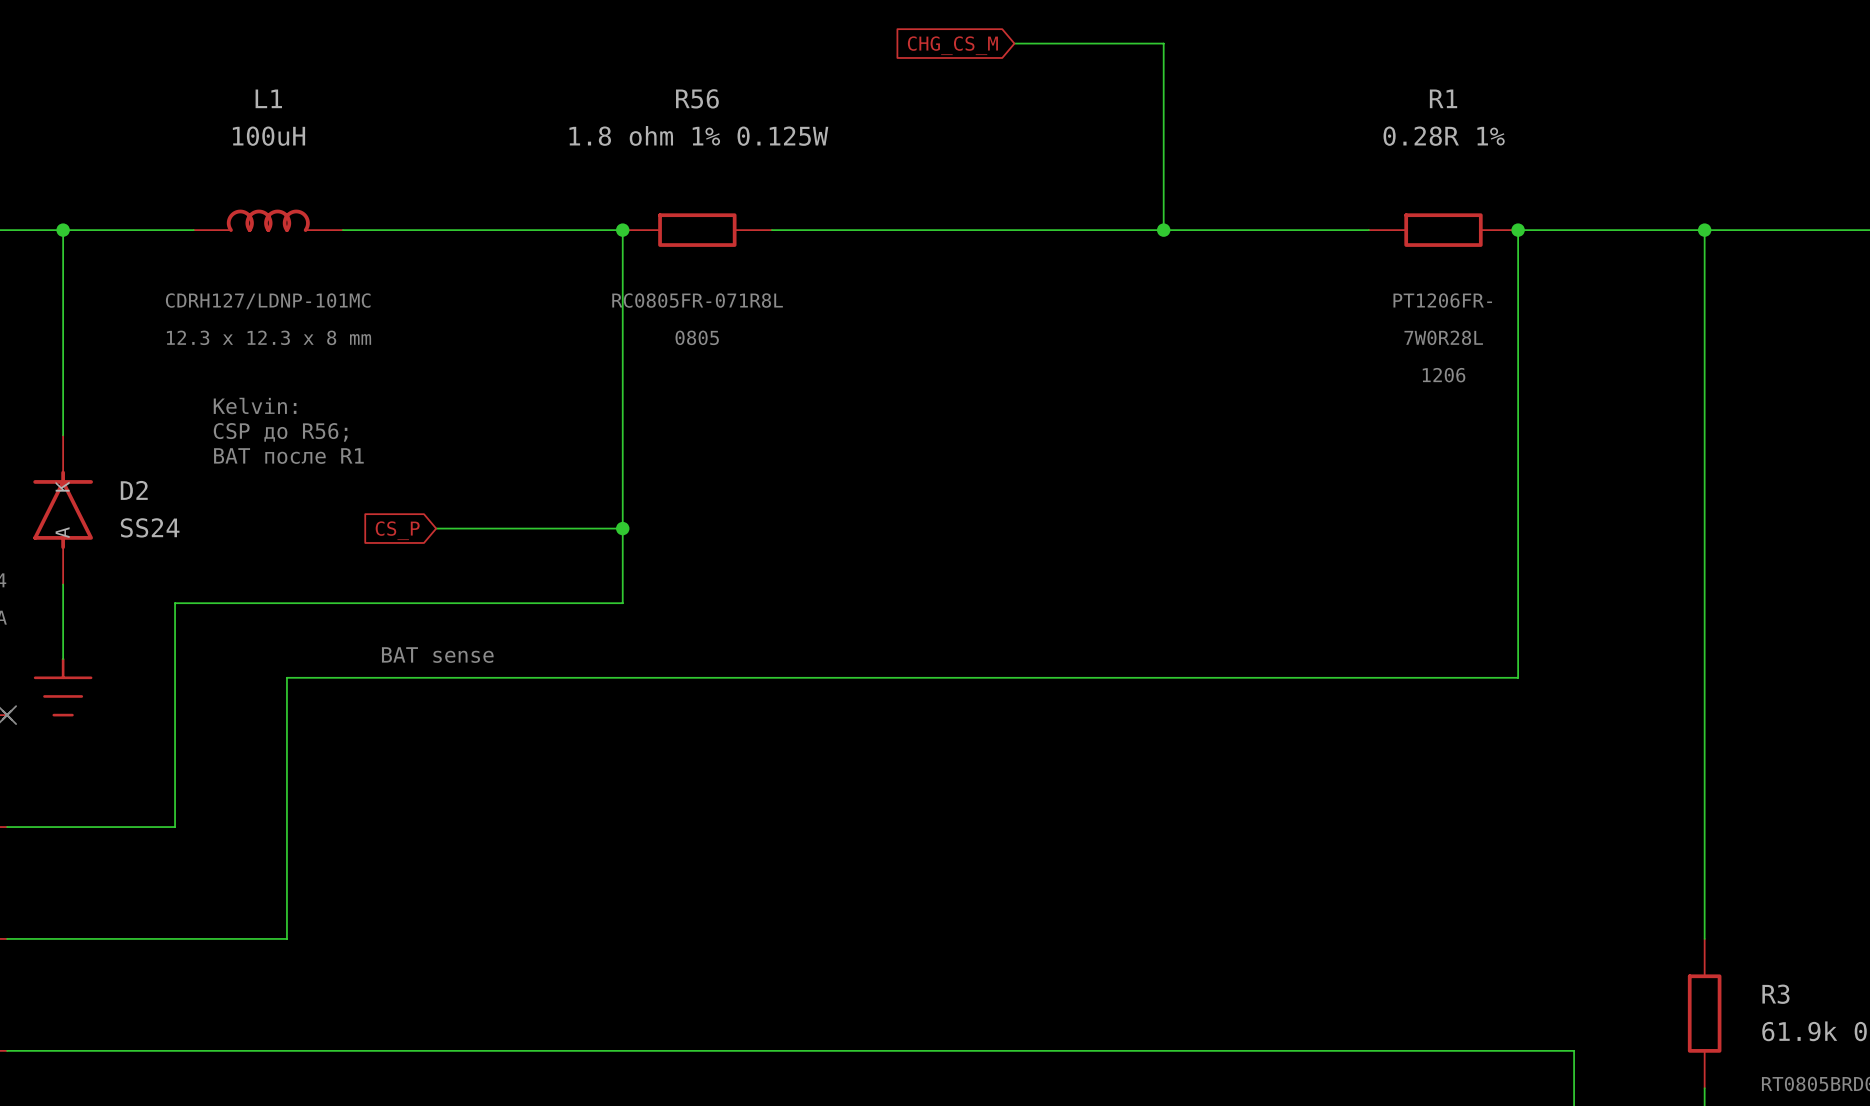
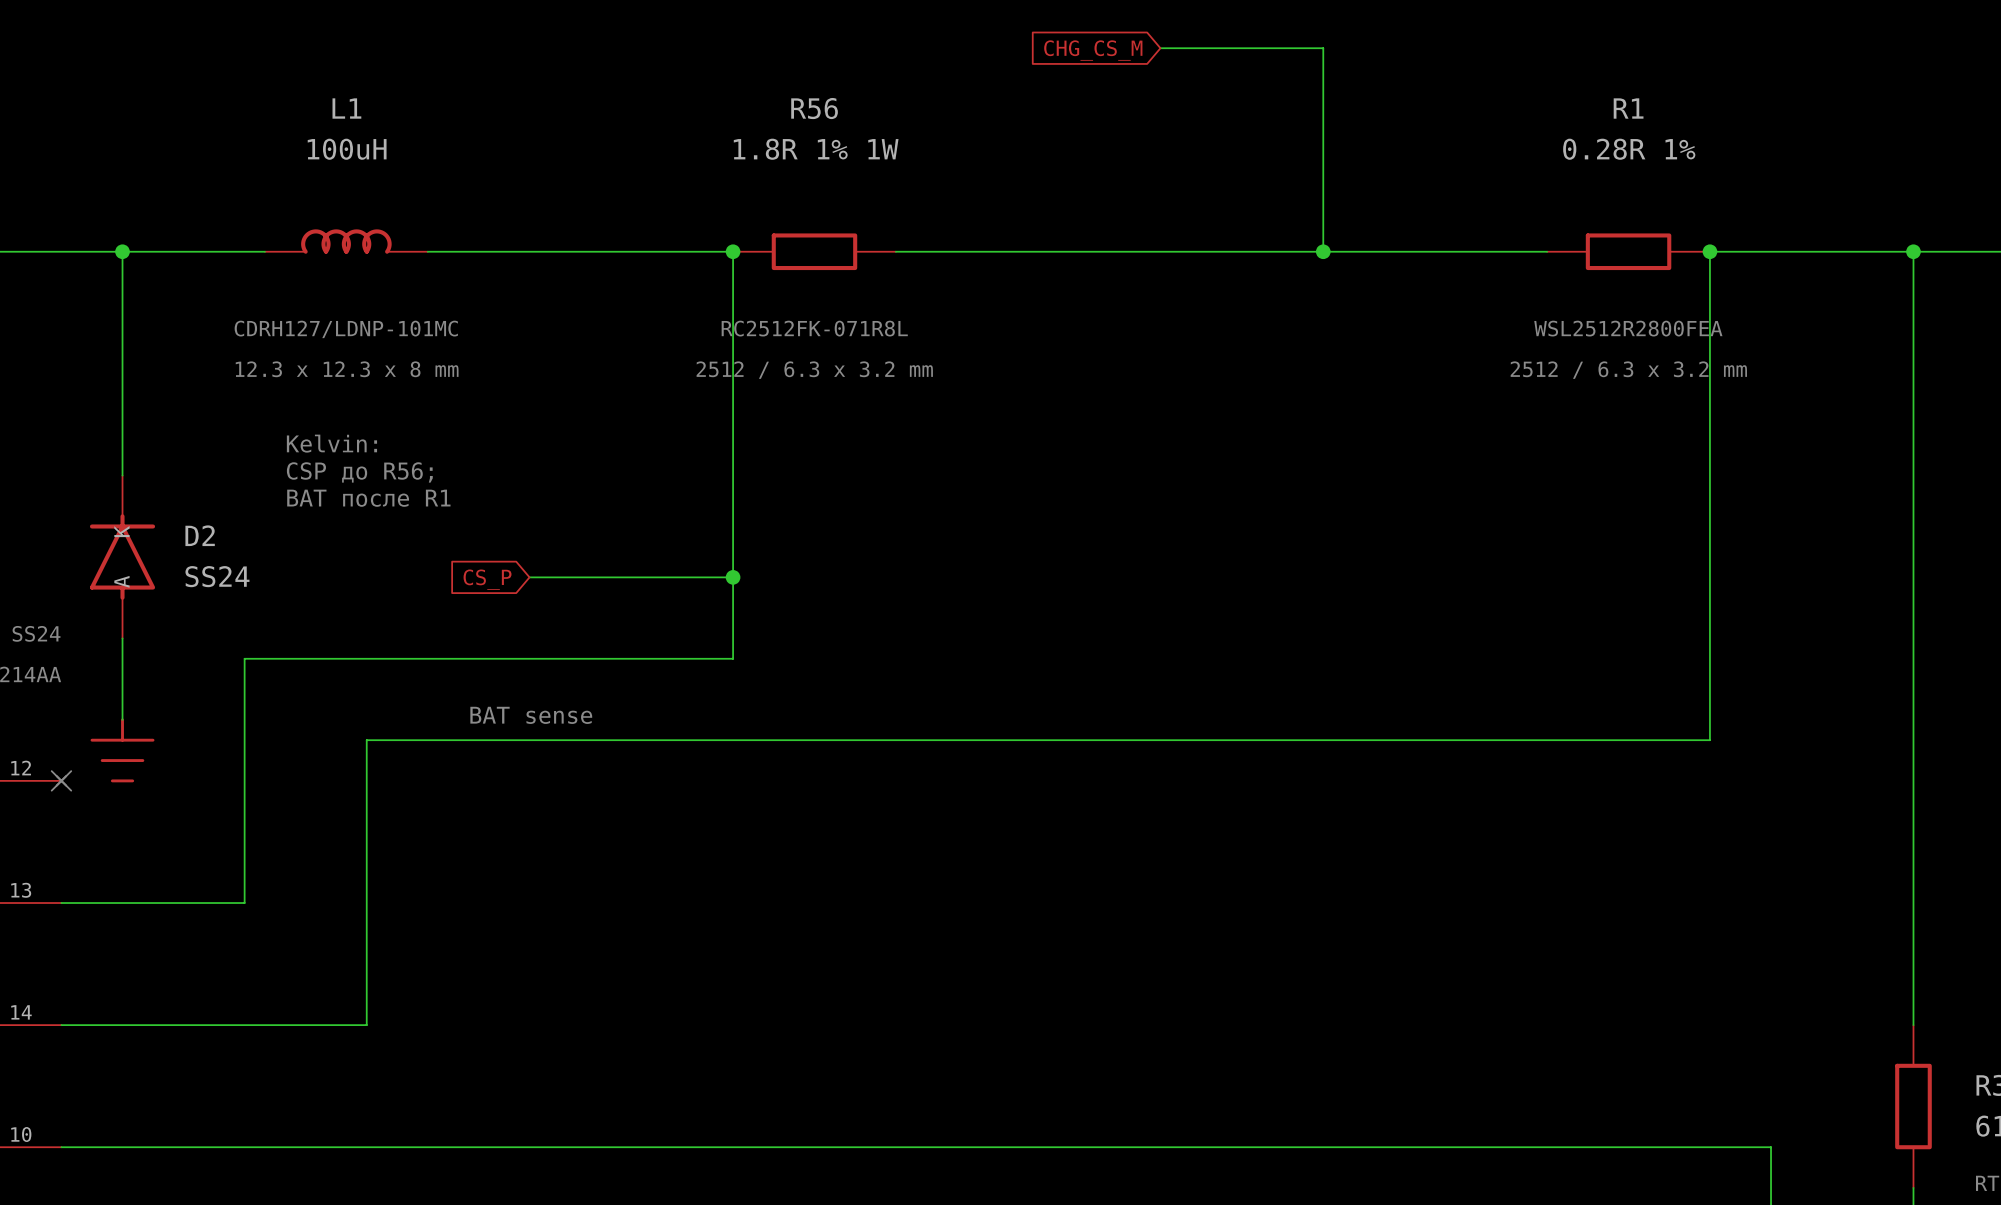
R56 value: 1.8 ohm 1% 0.125W (698, 135) -> 1.8R 1% 1W (816, 149)
text: RC0805FR-071R8L (697, 300) -> RC2512FK-071R8L (814, 328)
text: PT1206FR- (1442, 300) -> WSL2512R2800FEA (1628, 328)
text: 0805 (697, 337) -> 2512 / 6.3 x 3.2 mm (814, 370)
text: 7W0R28L (1443, 337) -> 2512 / 6.3 x 3.2 mm (1628, 370)
text: 1206 (1444, 375) -> none

